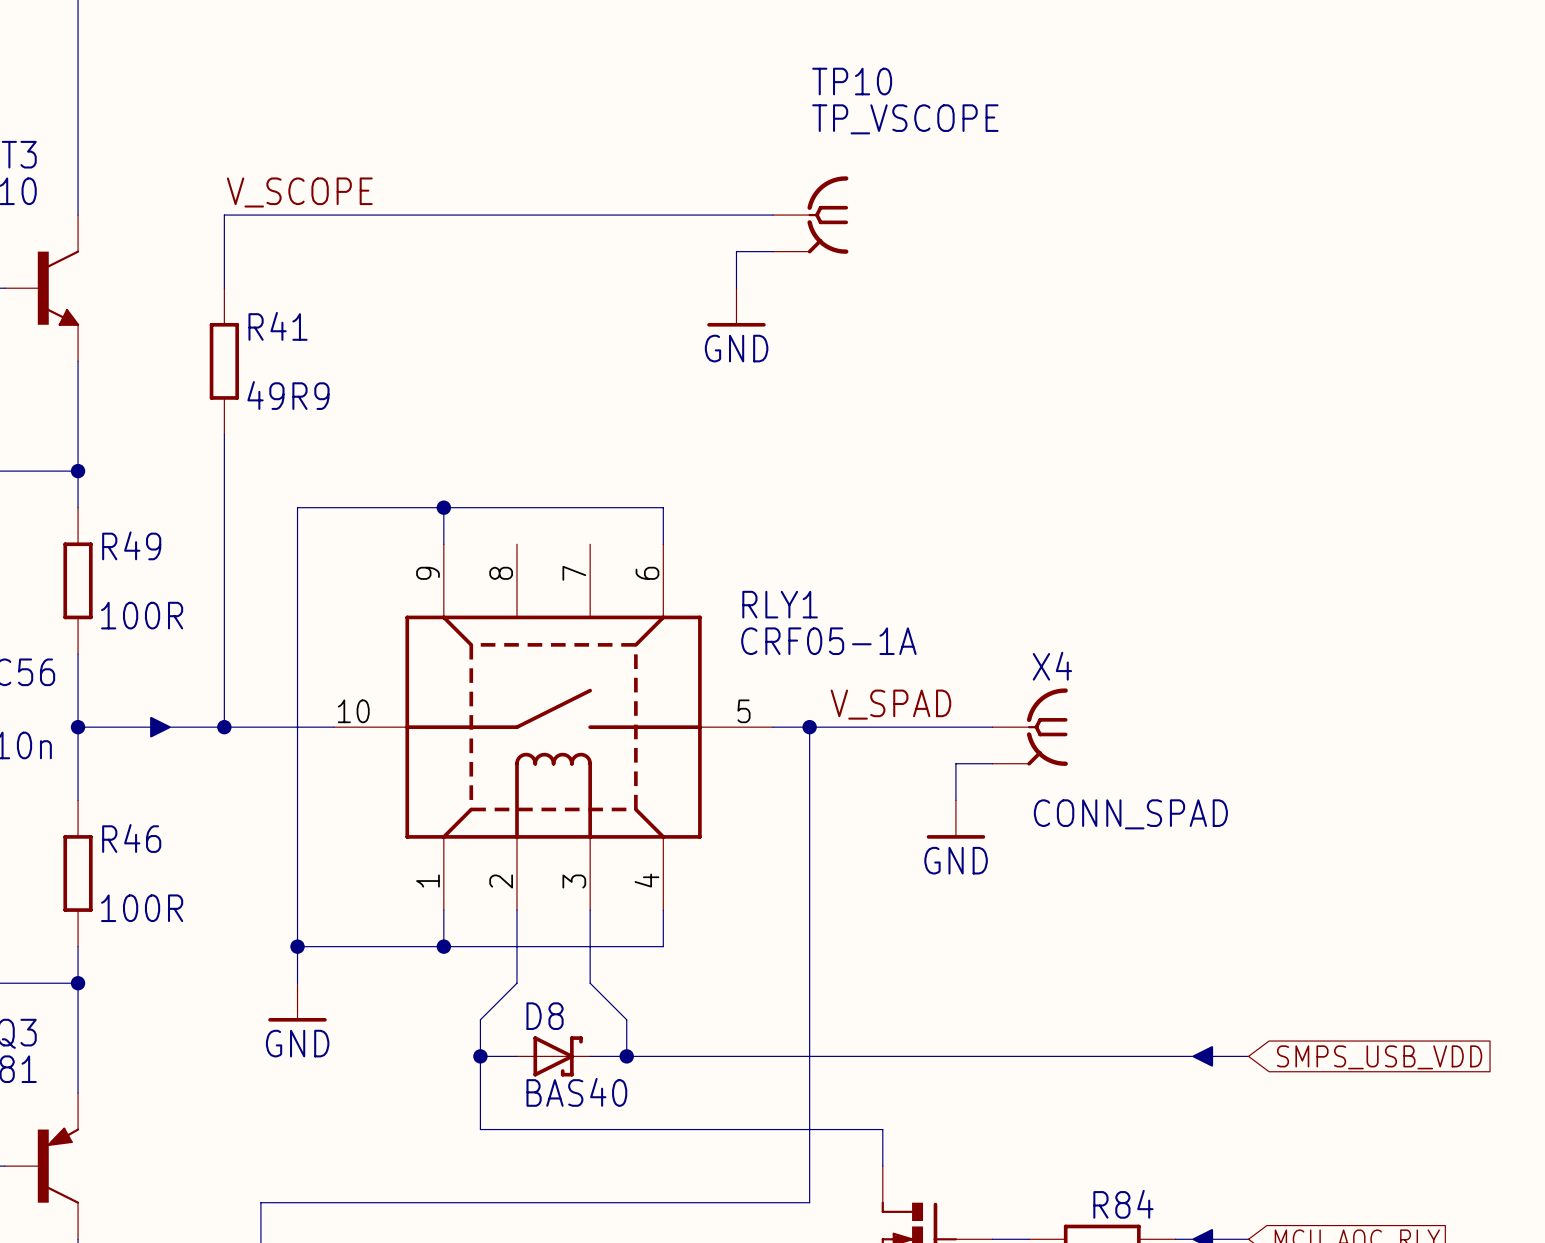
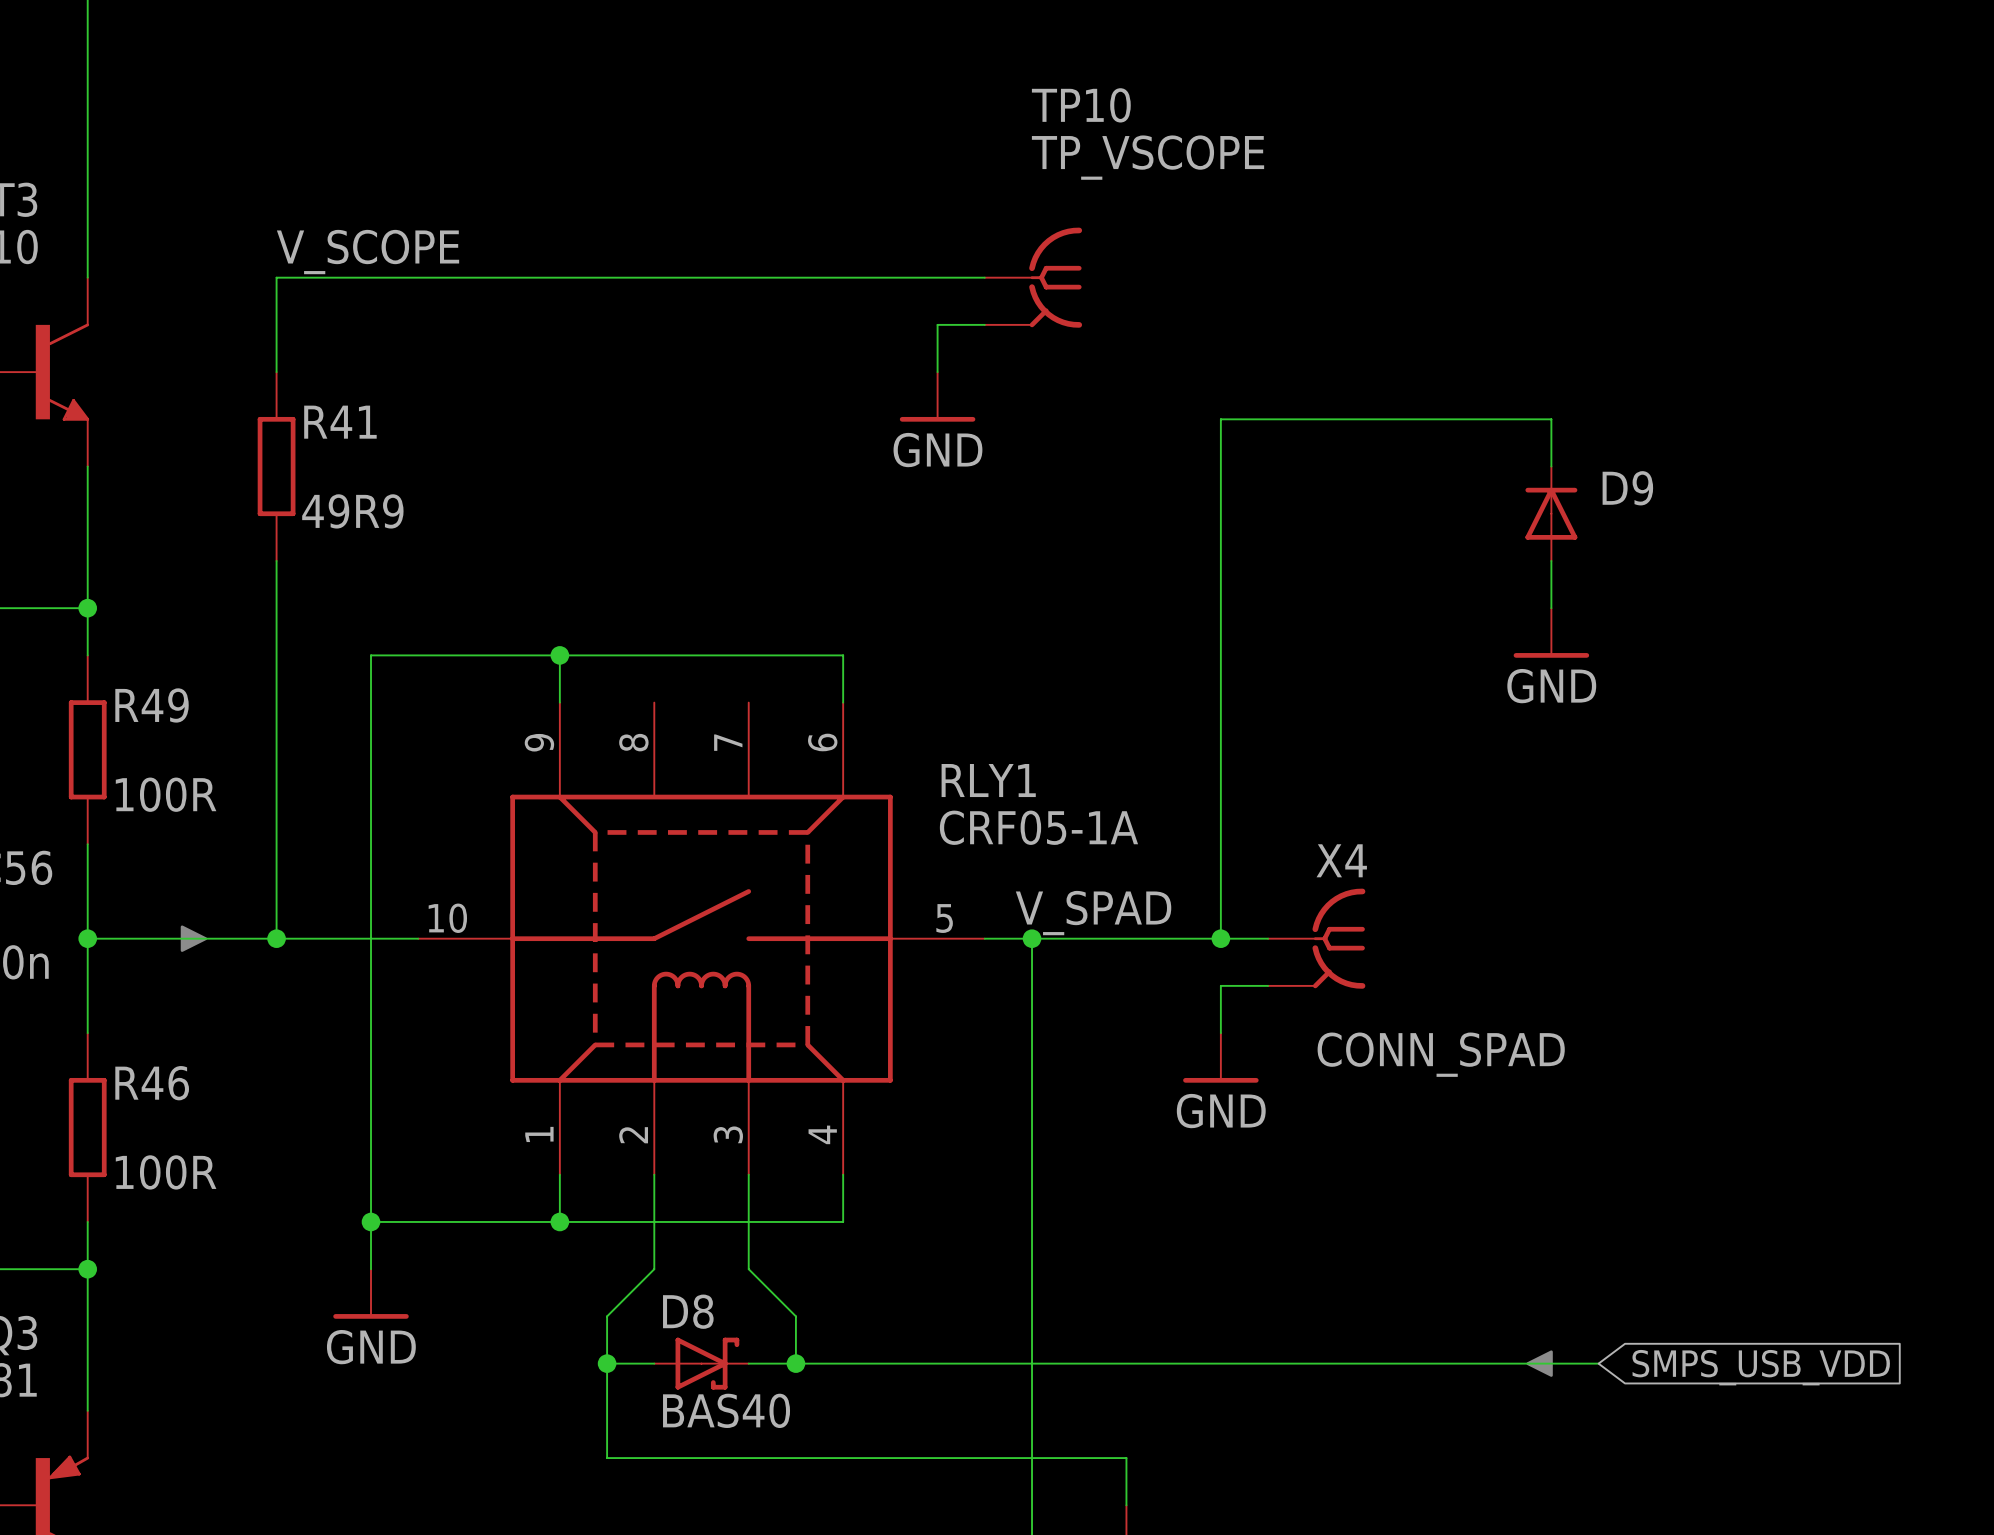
wire: none -> (1551, 466) (1551, 419) (1220, 419) (1220, 938)
D9: none -> (1551, 513)
wire: none -> (1551, 560) (1551, 608)
power symbol: none -> GND (1551, 632)
label position: V_SPAD (890, 704) -> V_SPAD (1093, 913)
junction: none -> (1220, 938)

